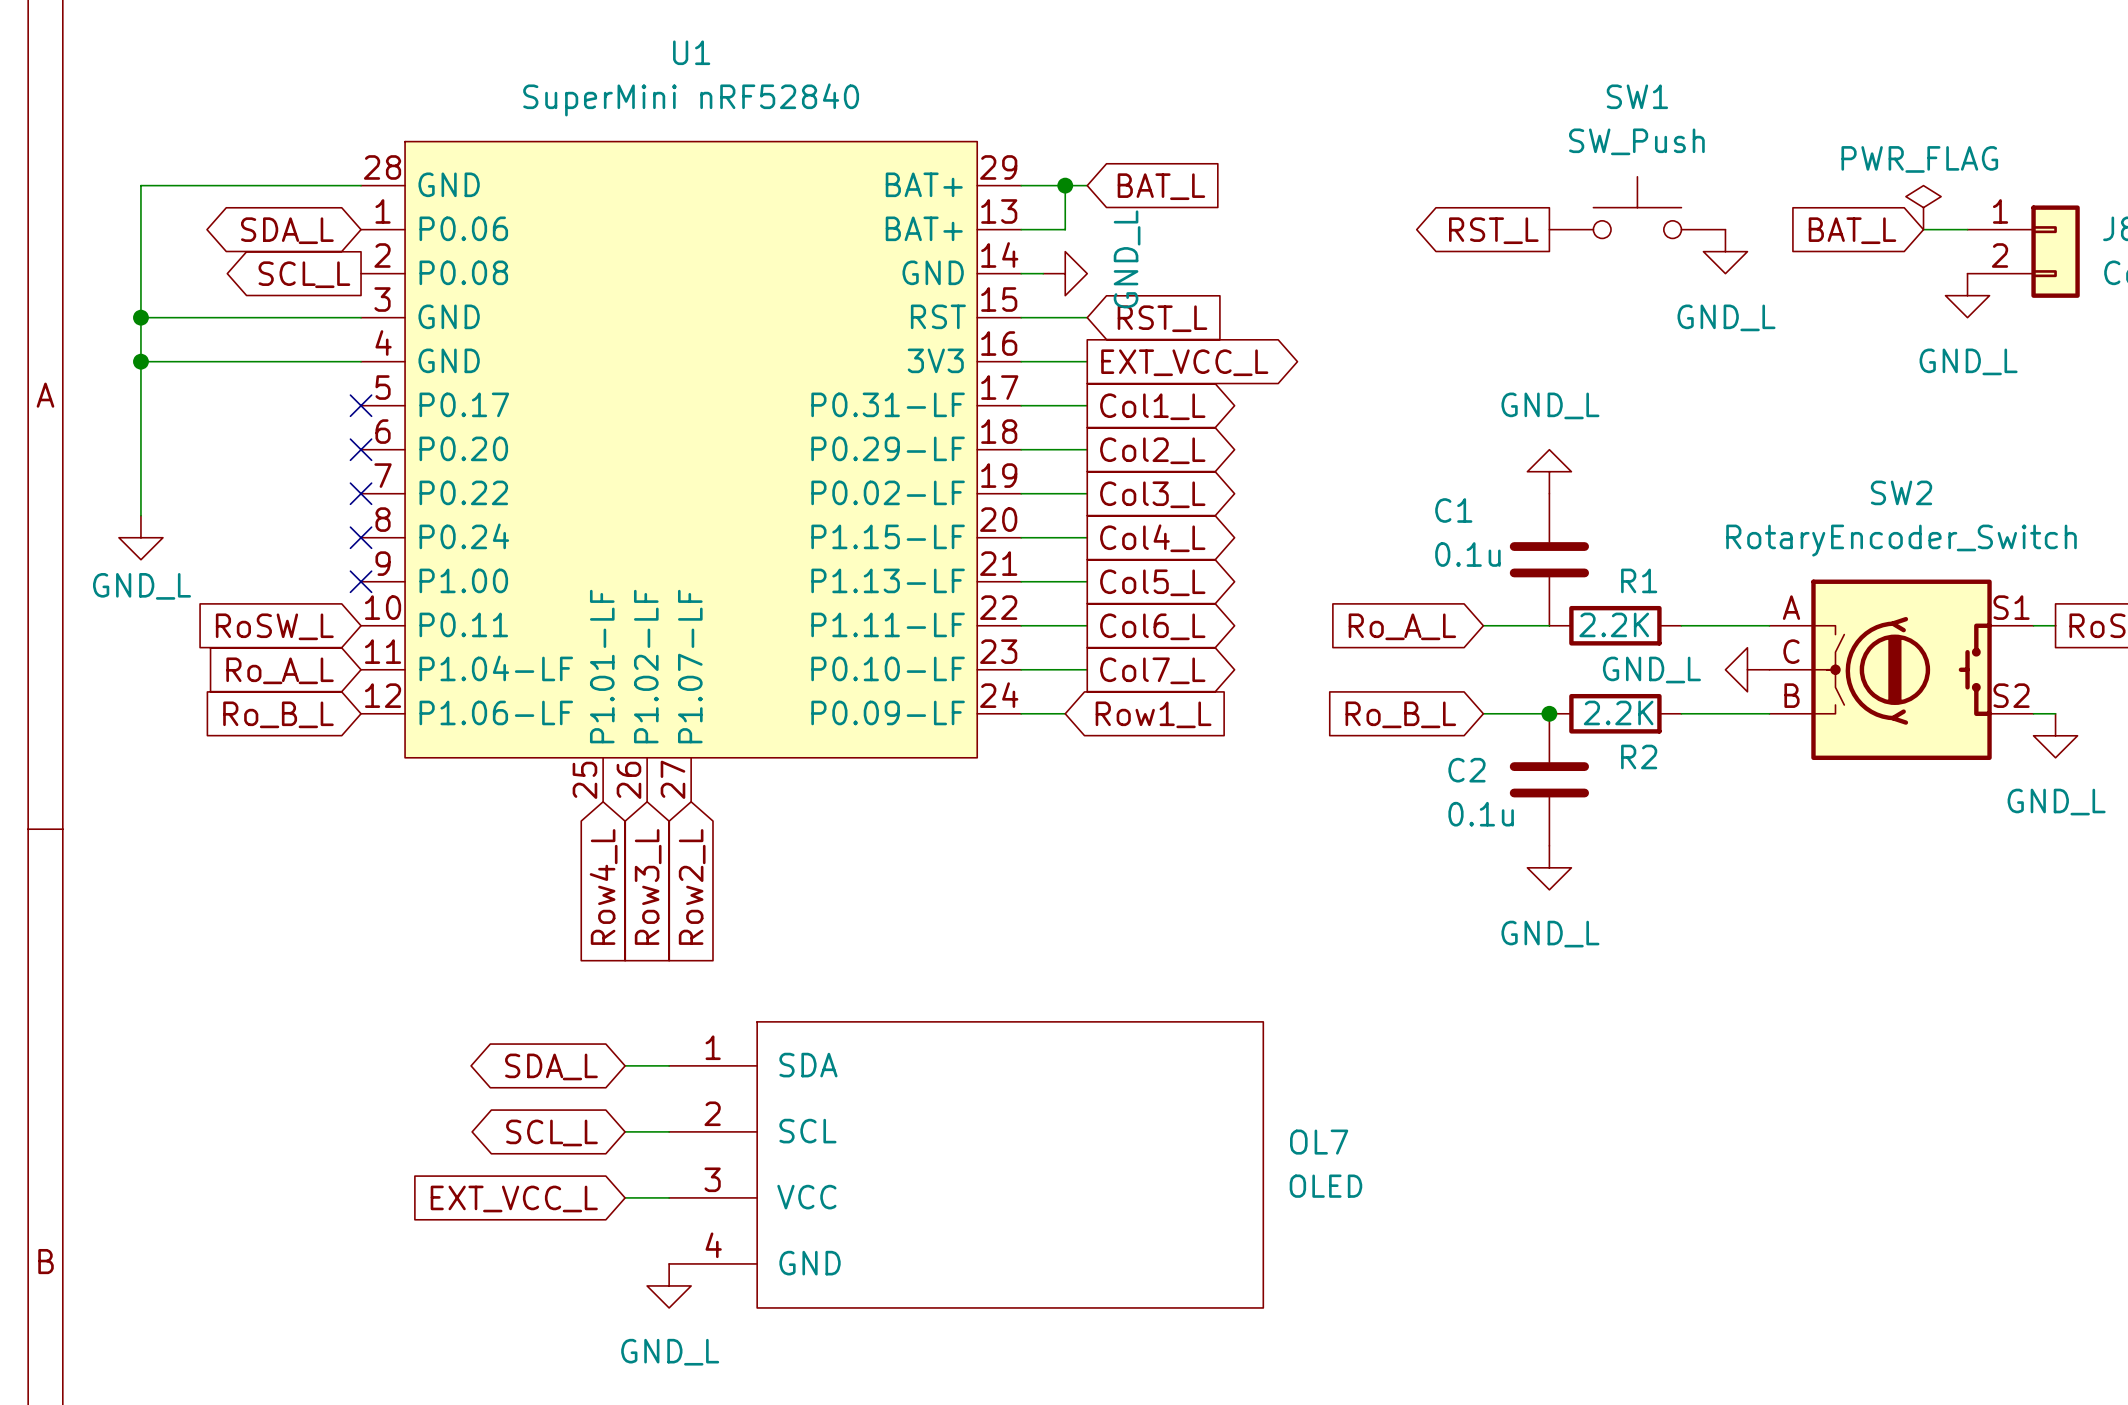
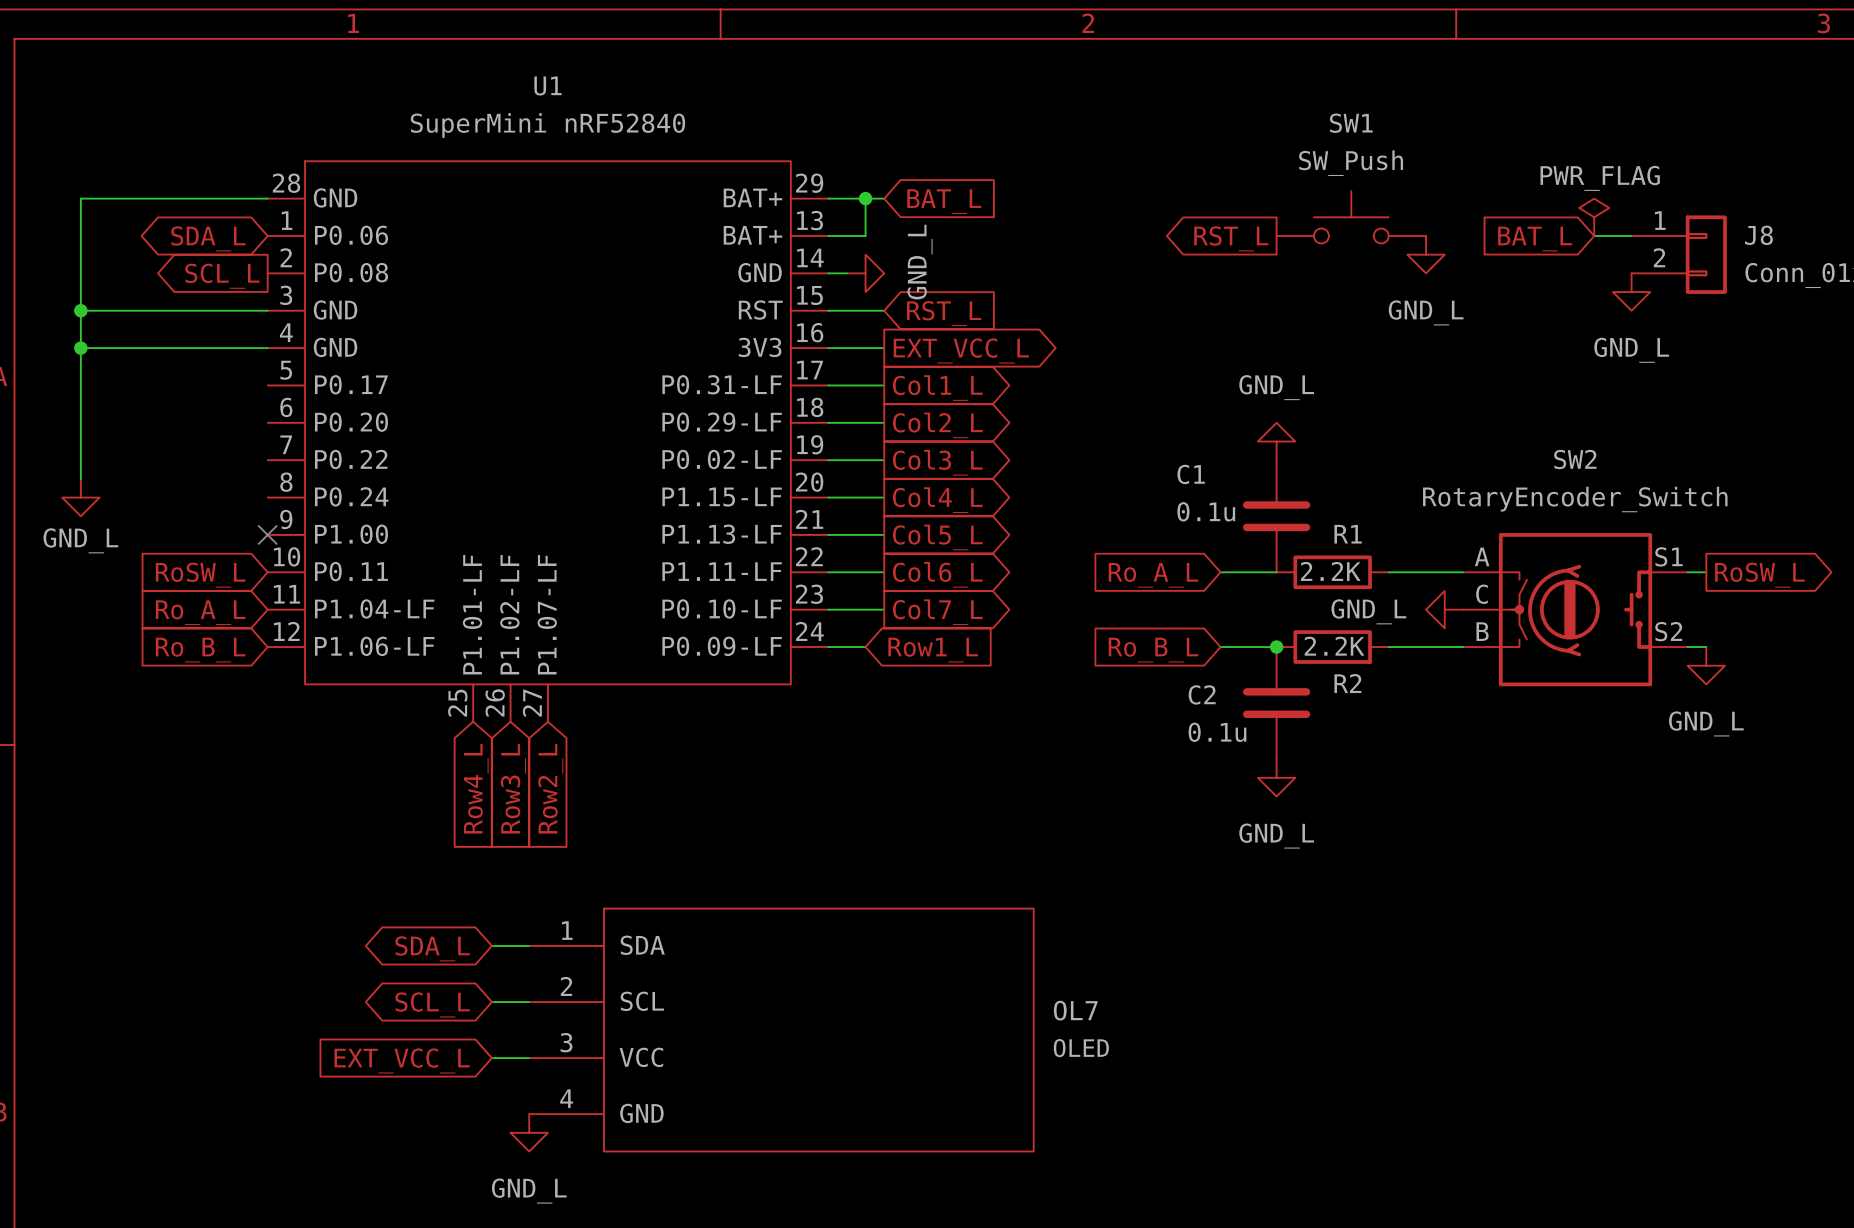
no-connect mark: (361, 405) -> none
no-connect mark: (361, 449) -> none
no-connect mark: (361, 493) -> none
no-connect mark: (361, 537) -> none

